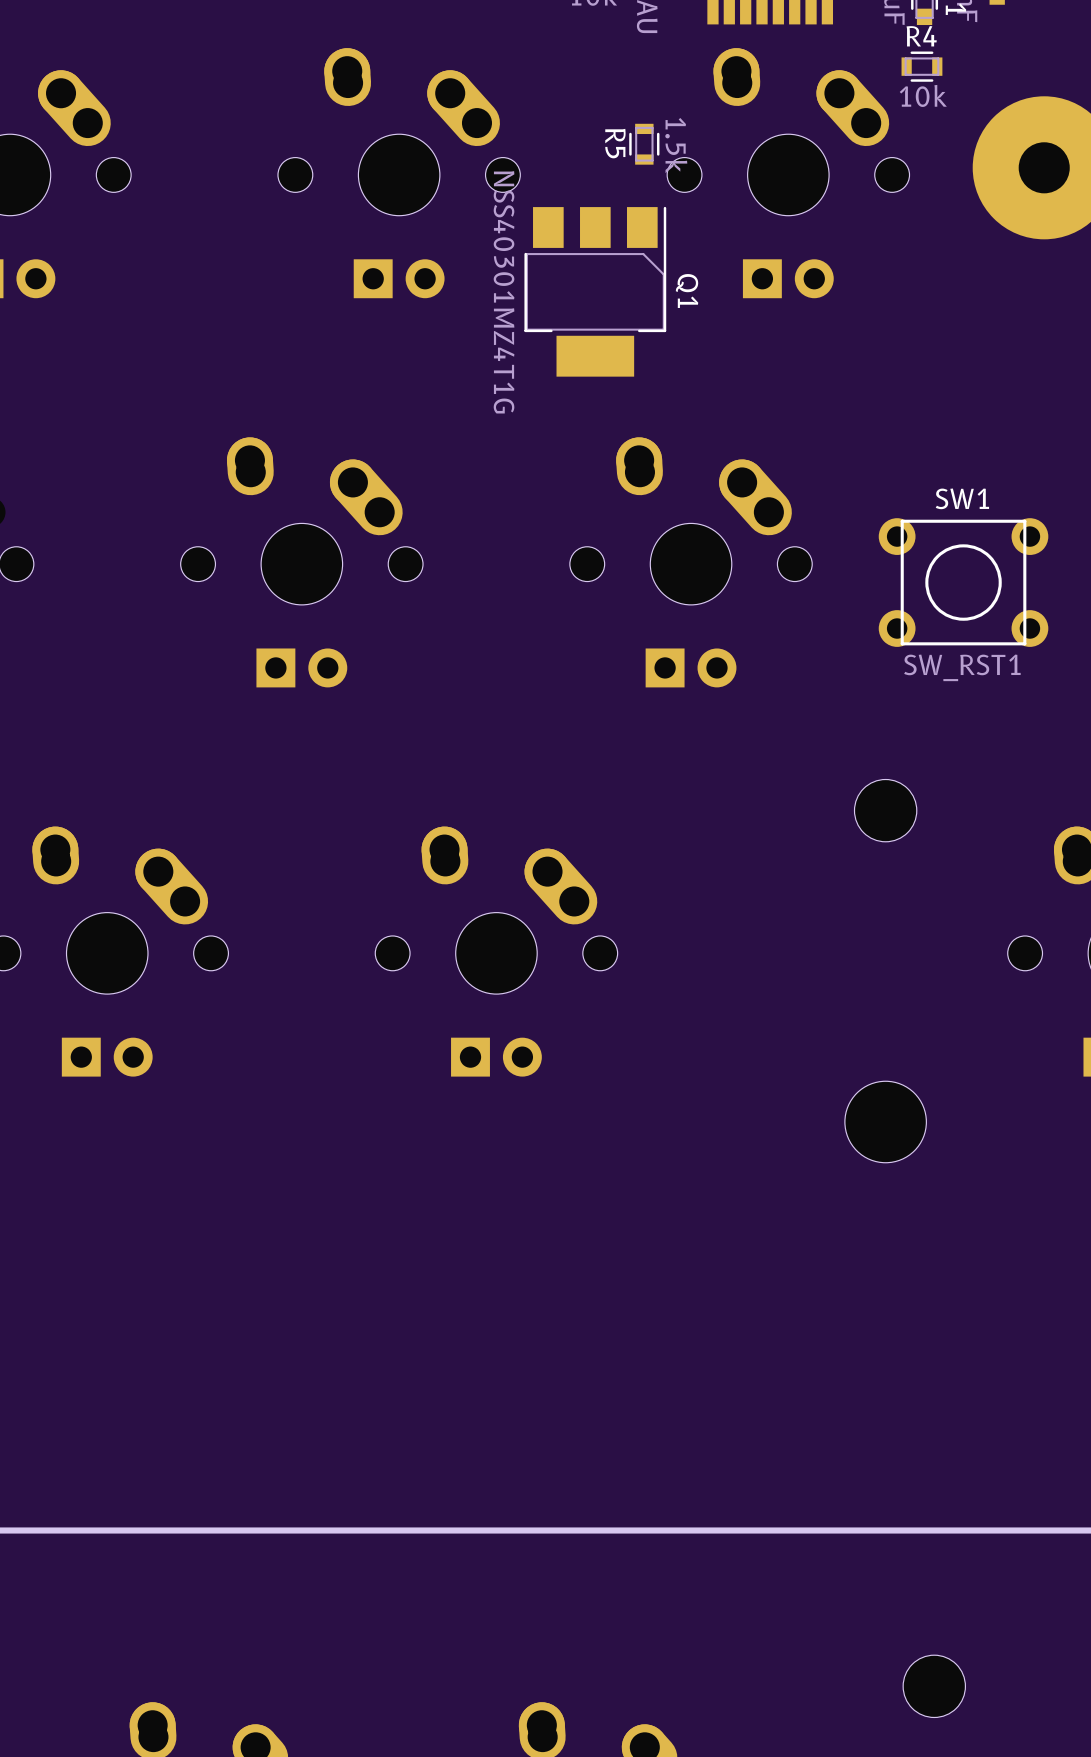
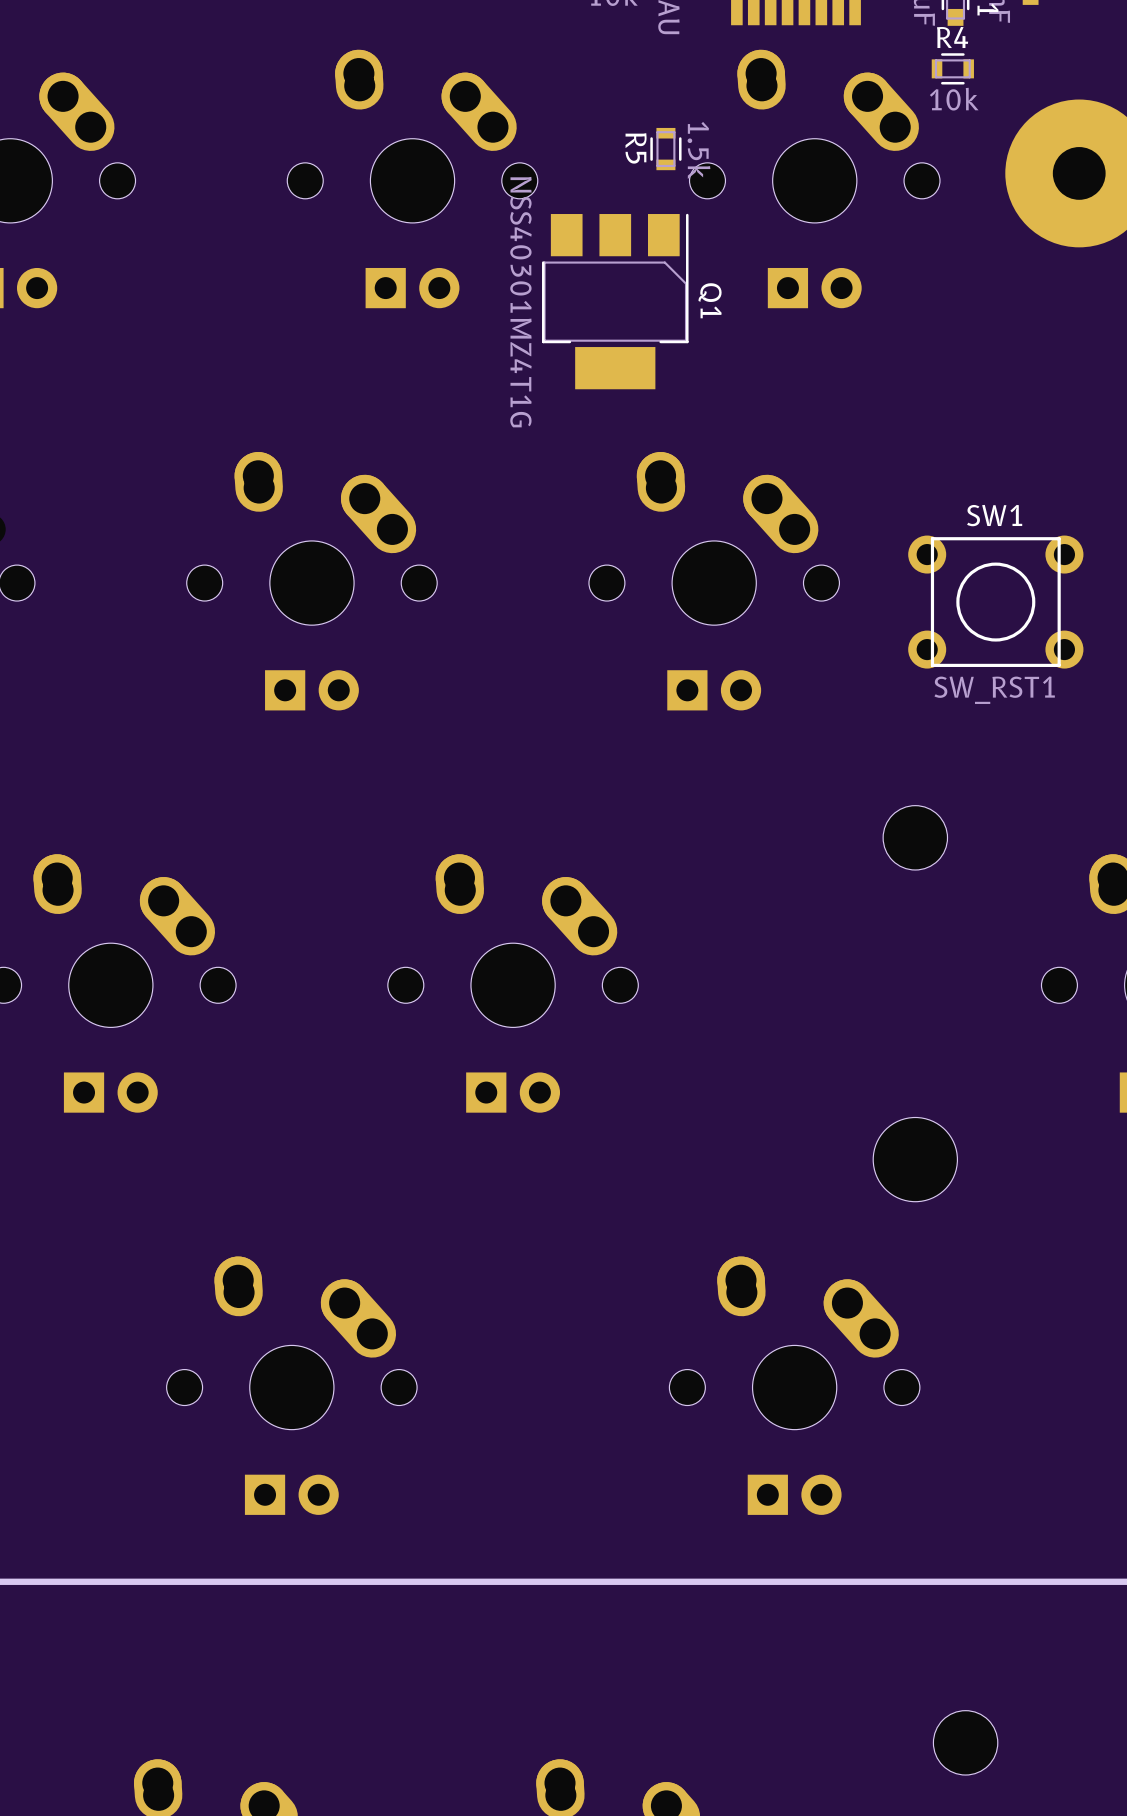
part: none -> (291, 1385)
part: none -> (794, 1385)

